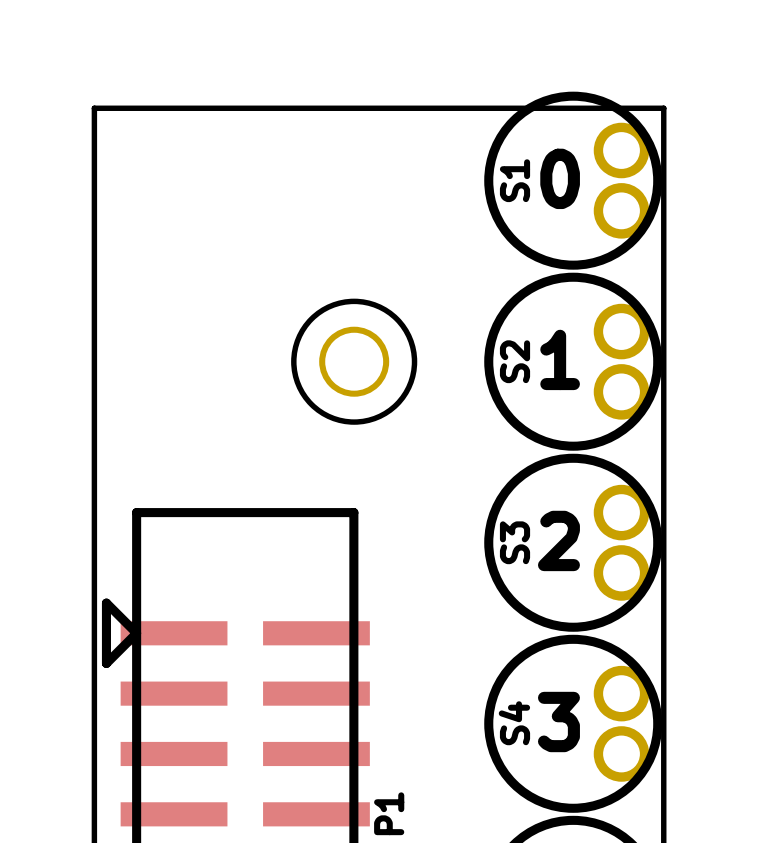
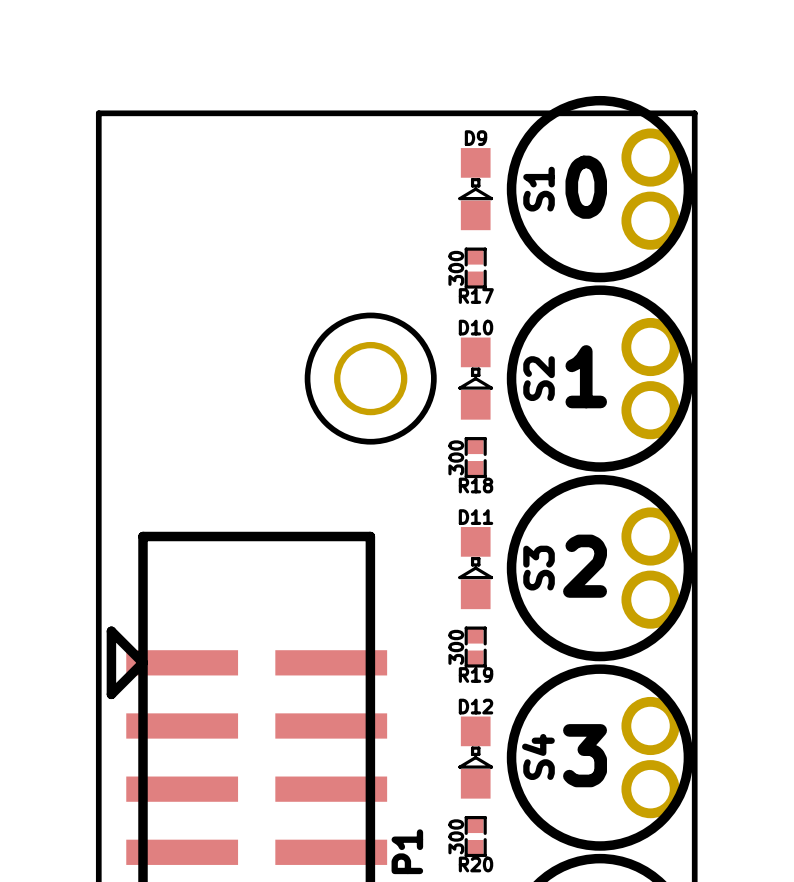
D9: none -> (475, 189)
R17: none -> 300 (475, 268)
D10: none -> (475, 378)
R18: none -> 300 (475, 457)
D11: none -> (475, 568)
R19: none -> 300 (475, 647)
D12: none -> (475, 757)
R20: none -> 300 (475, 836)

